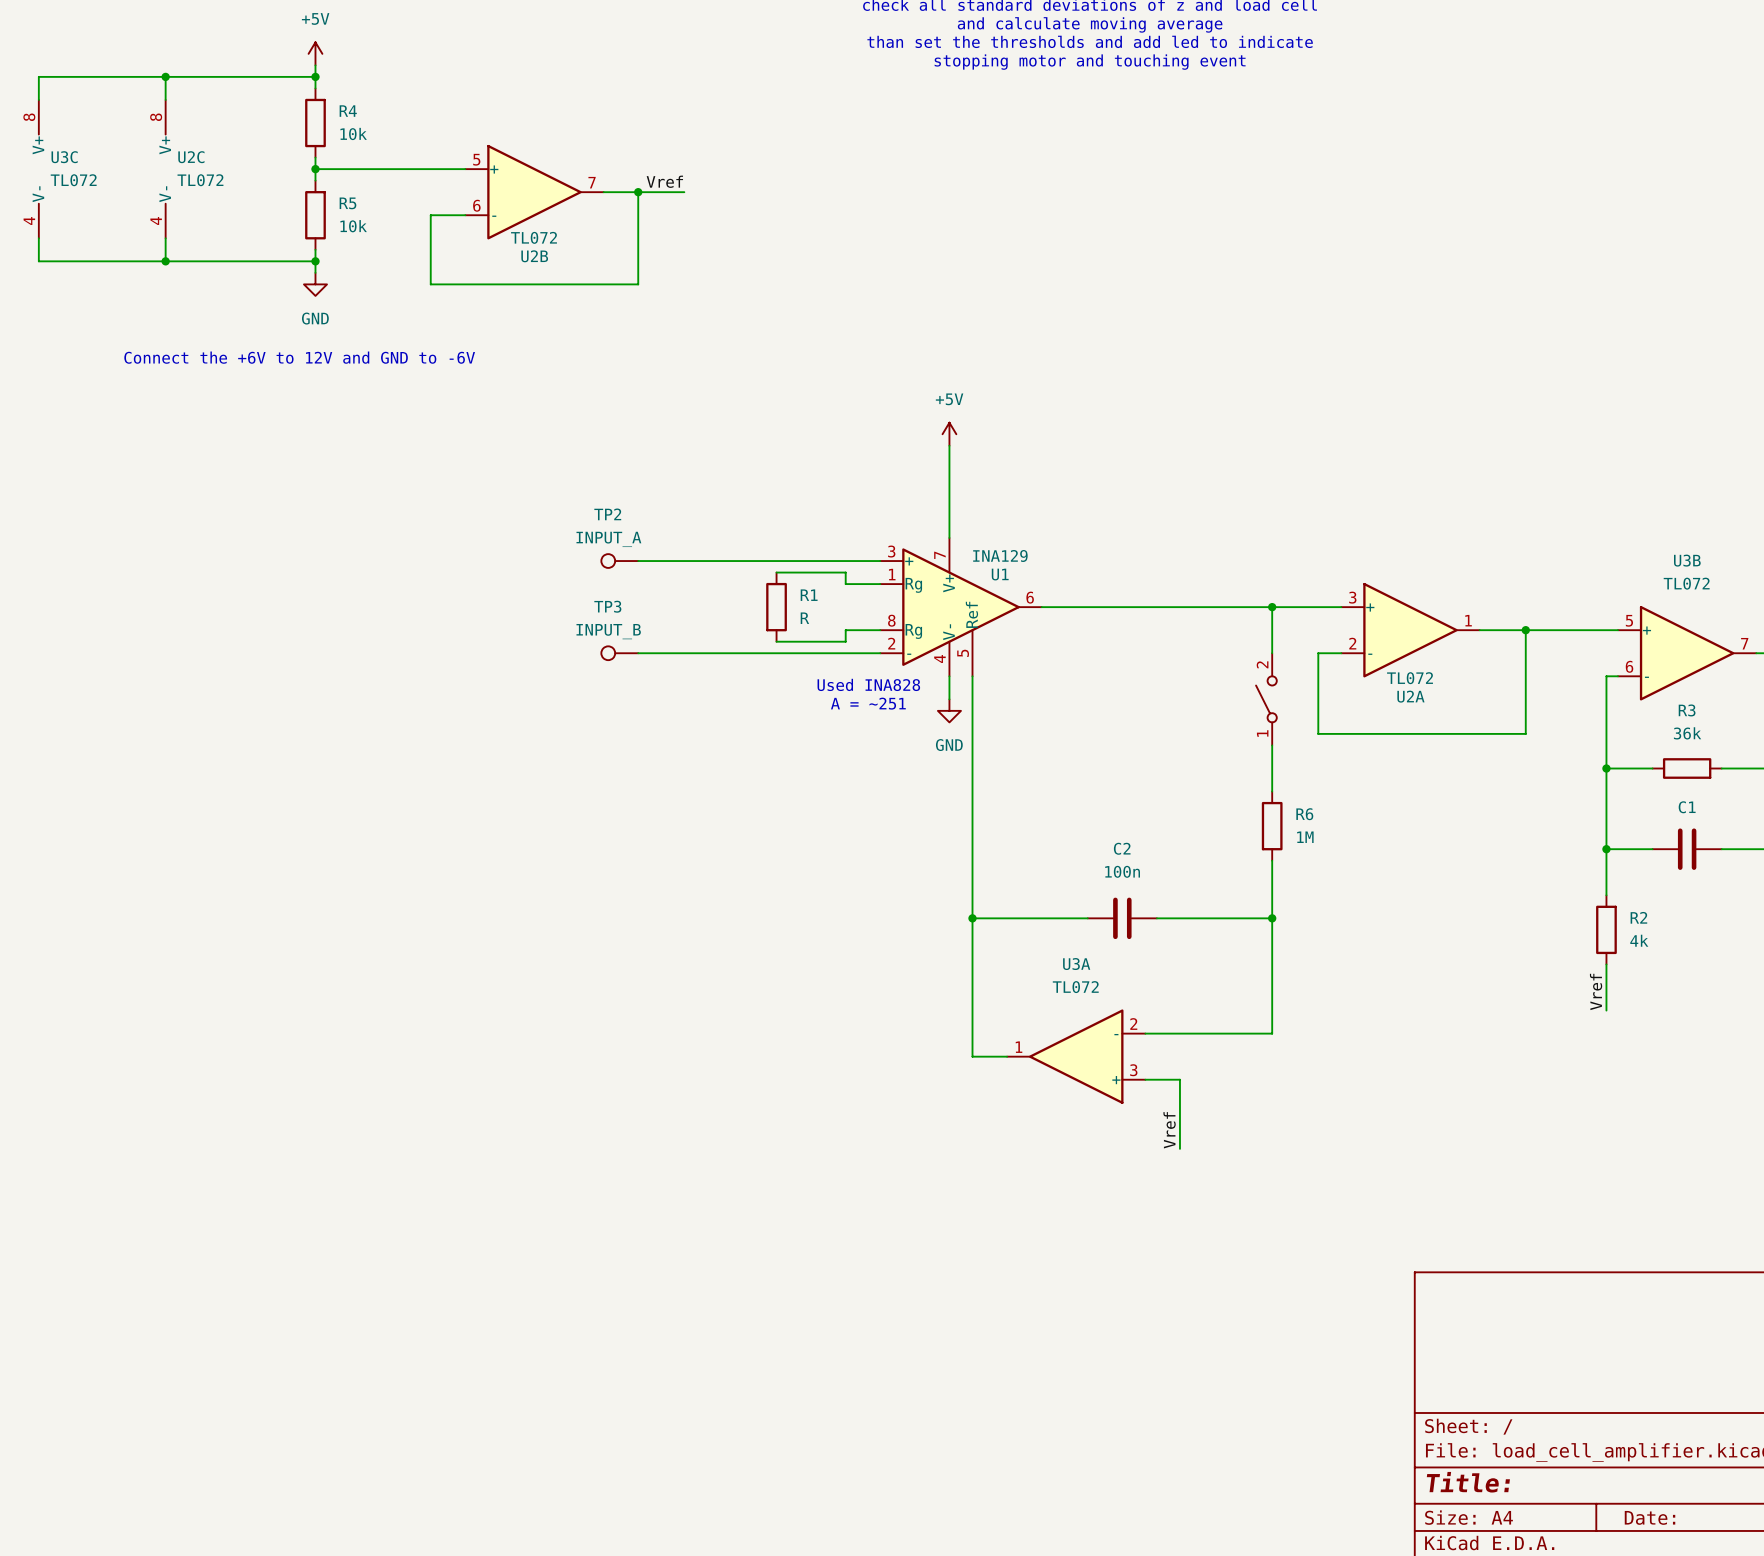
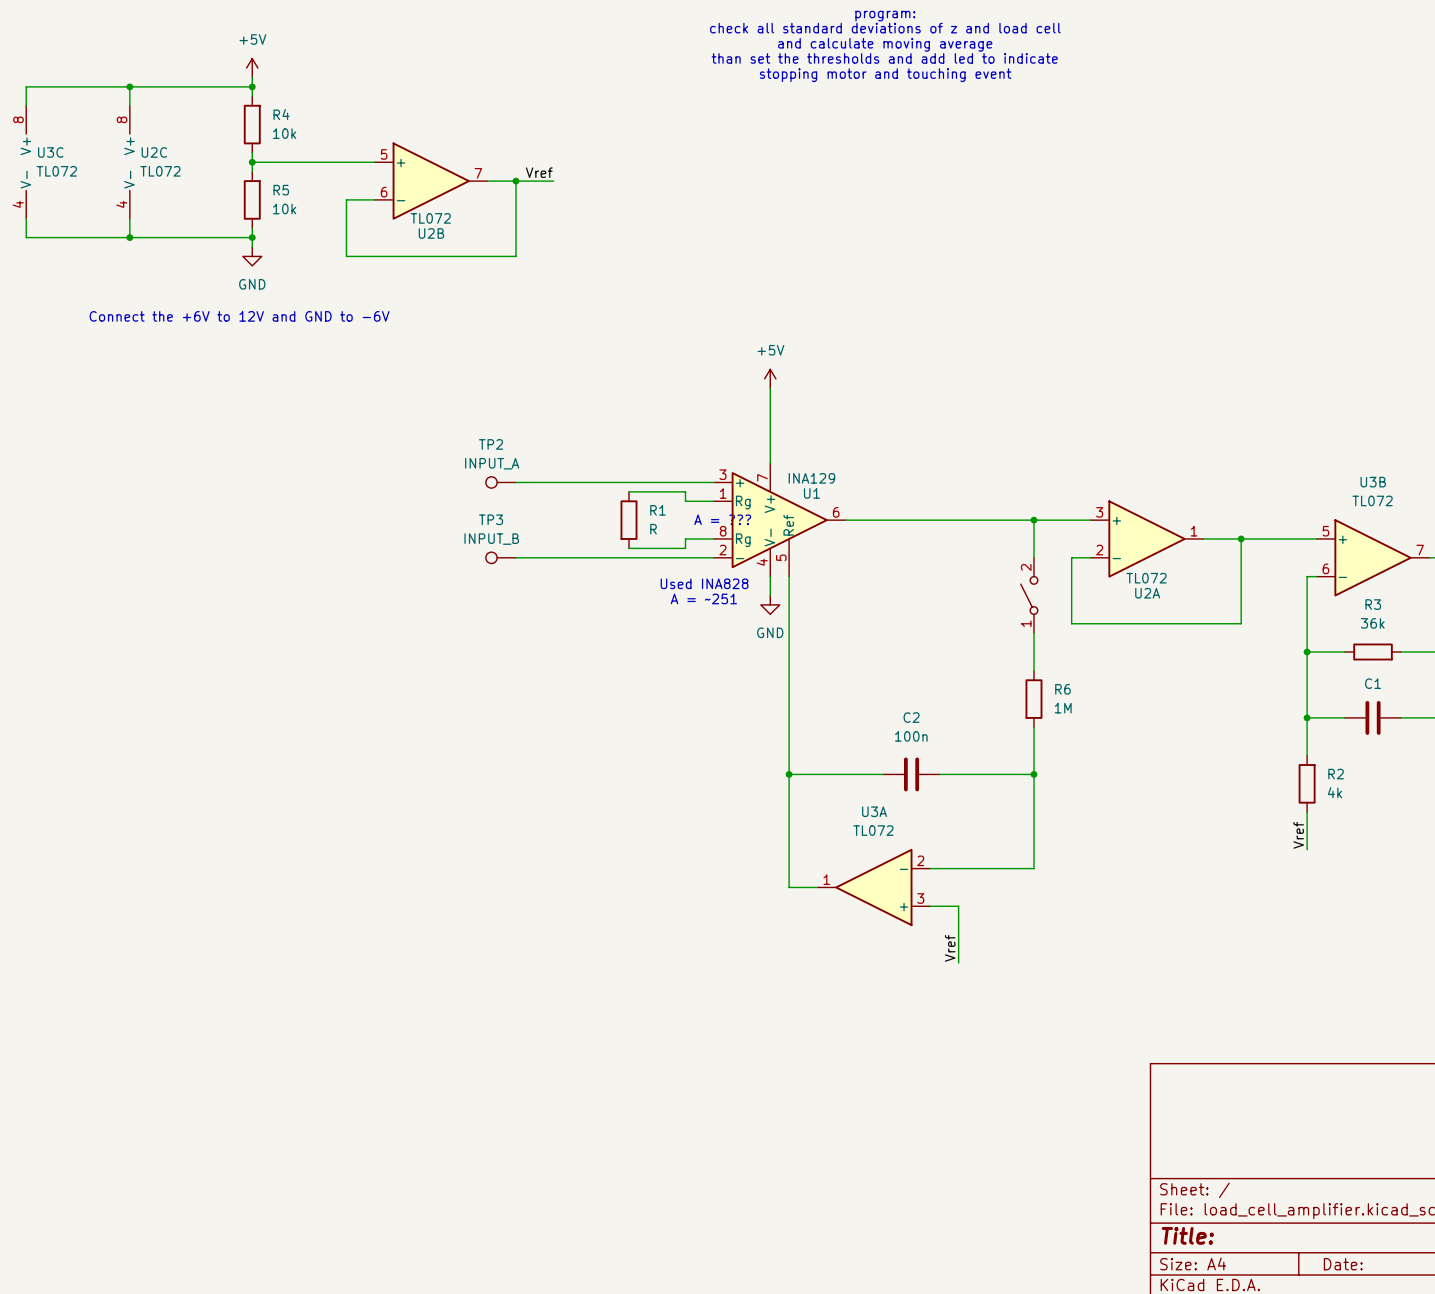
text: none -> A = ??? (722, 519)

